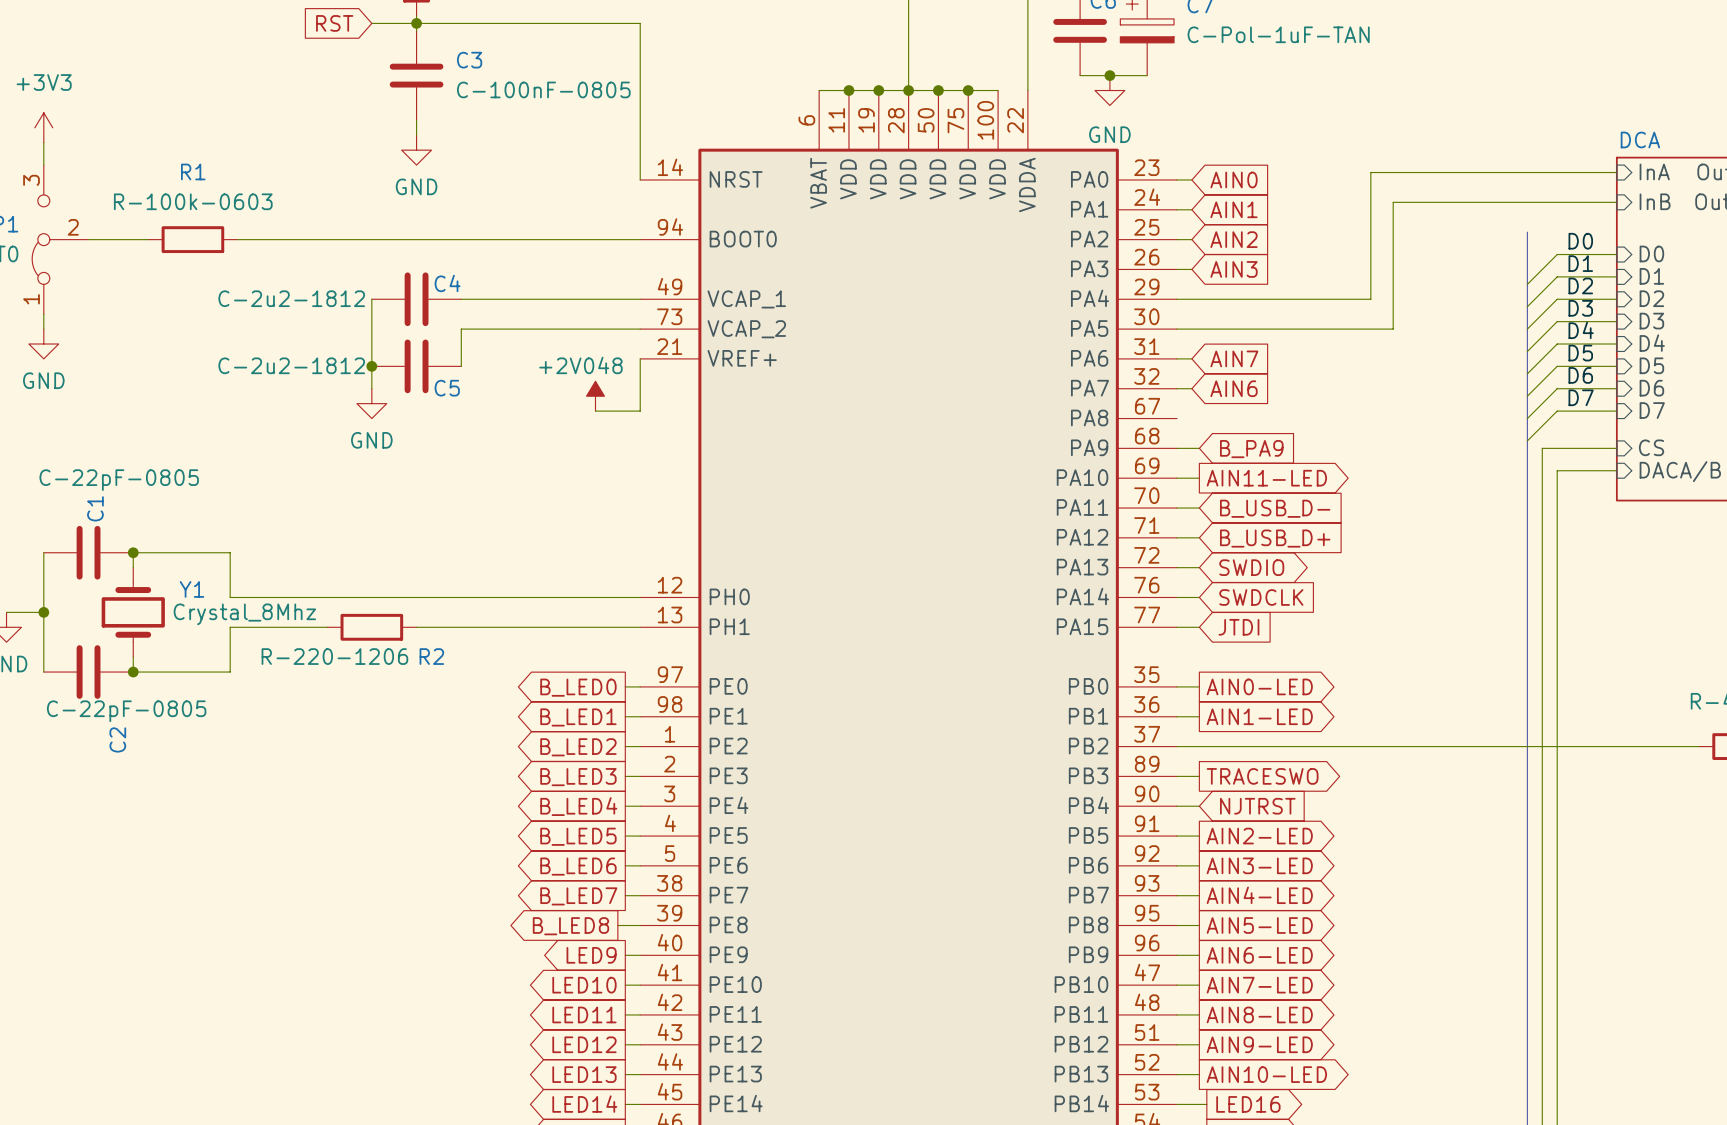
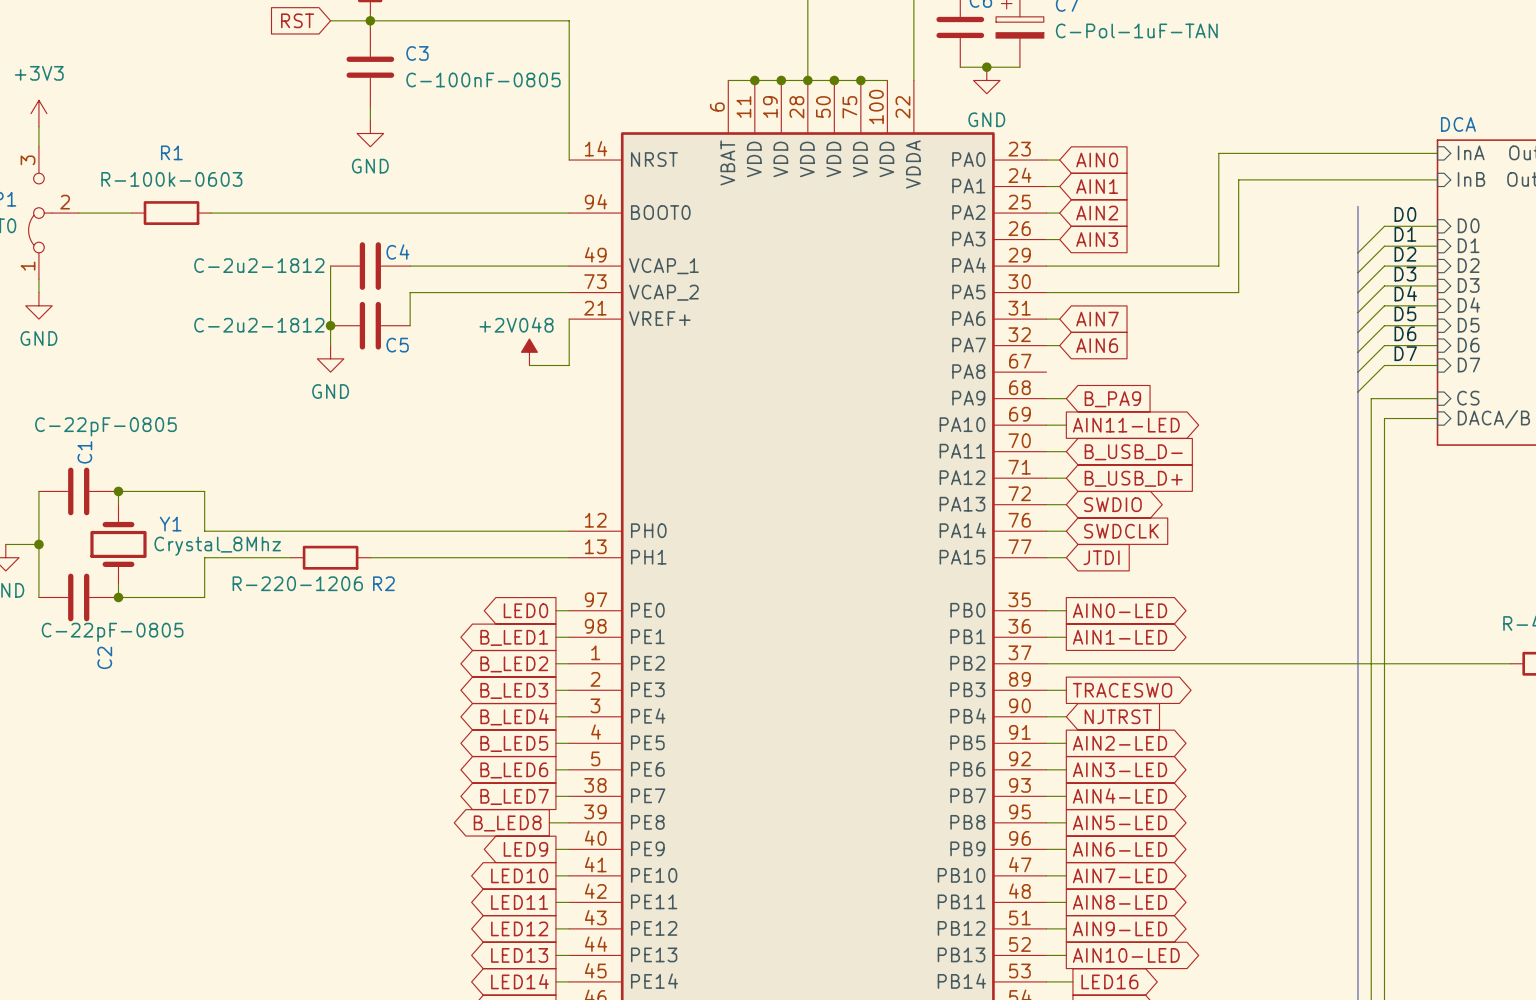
global label: B_LED0 (578, 687) -> LED0 (525, 610)

